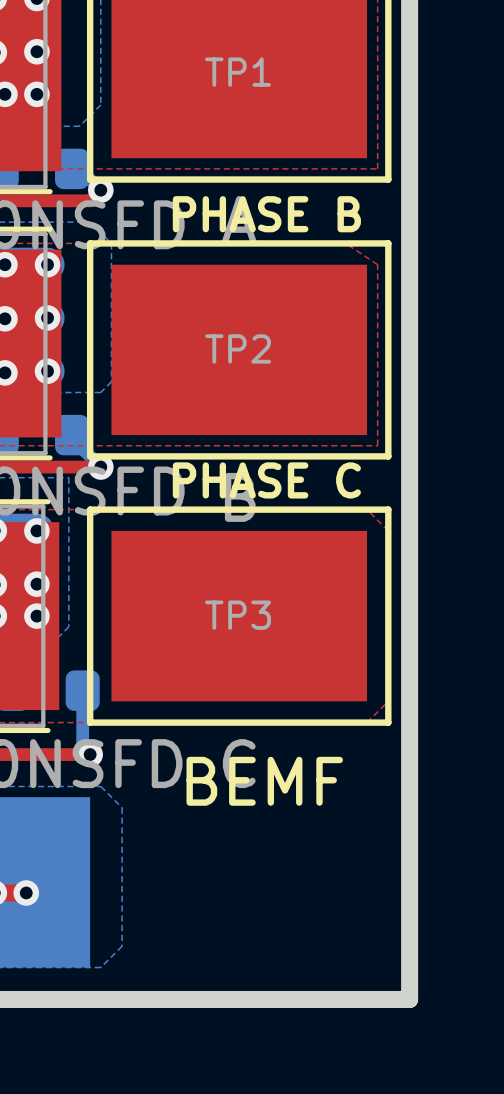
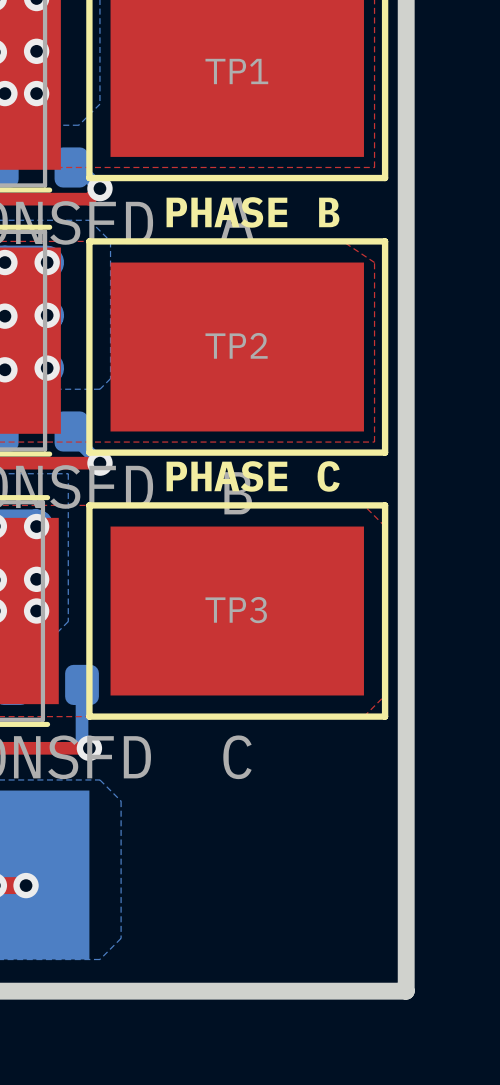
text: BEMF (264, 781) -> none

